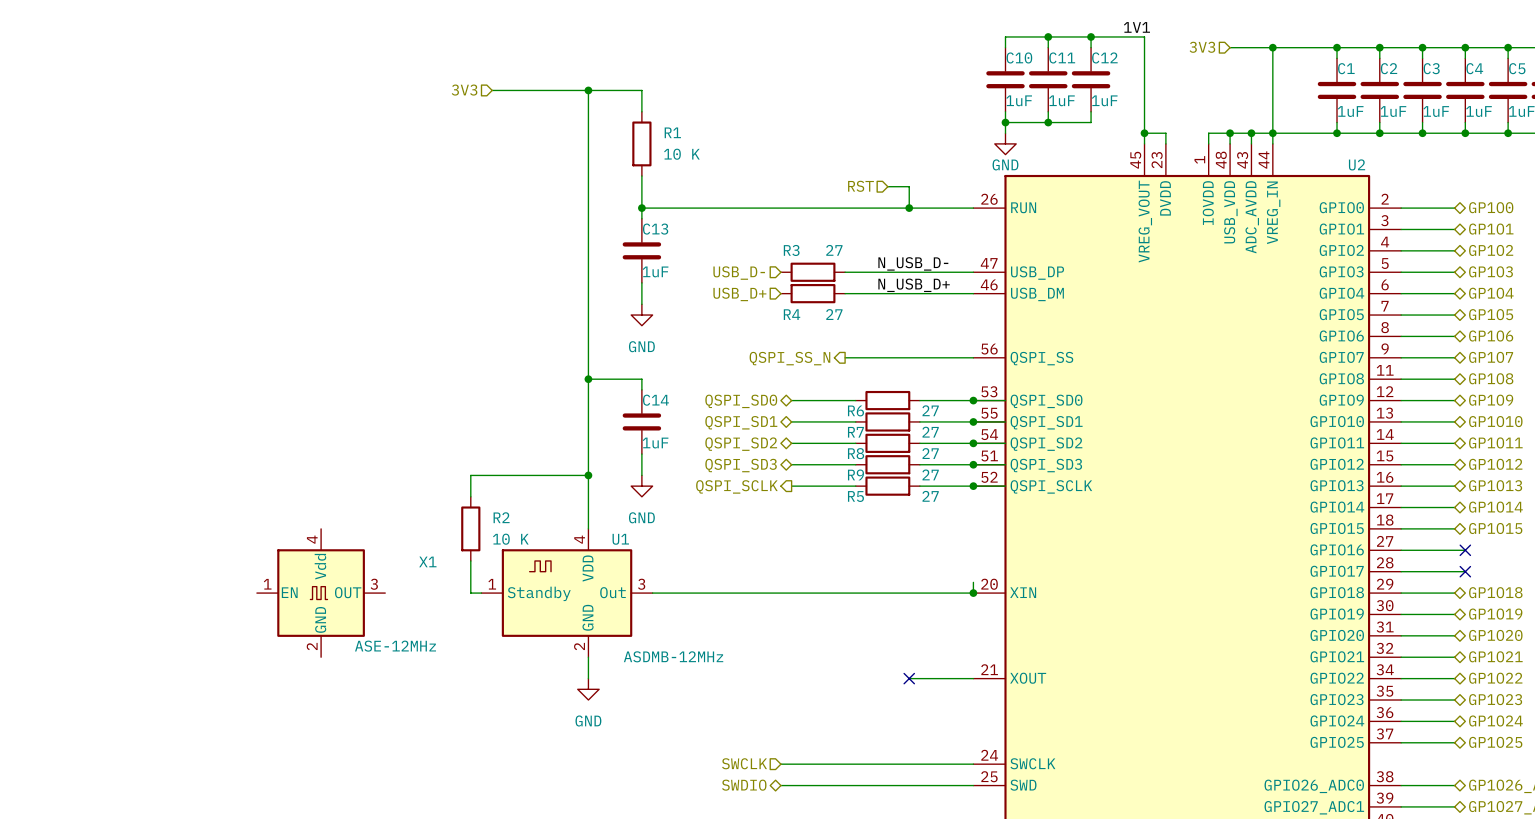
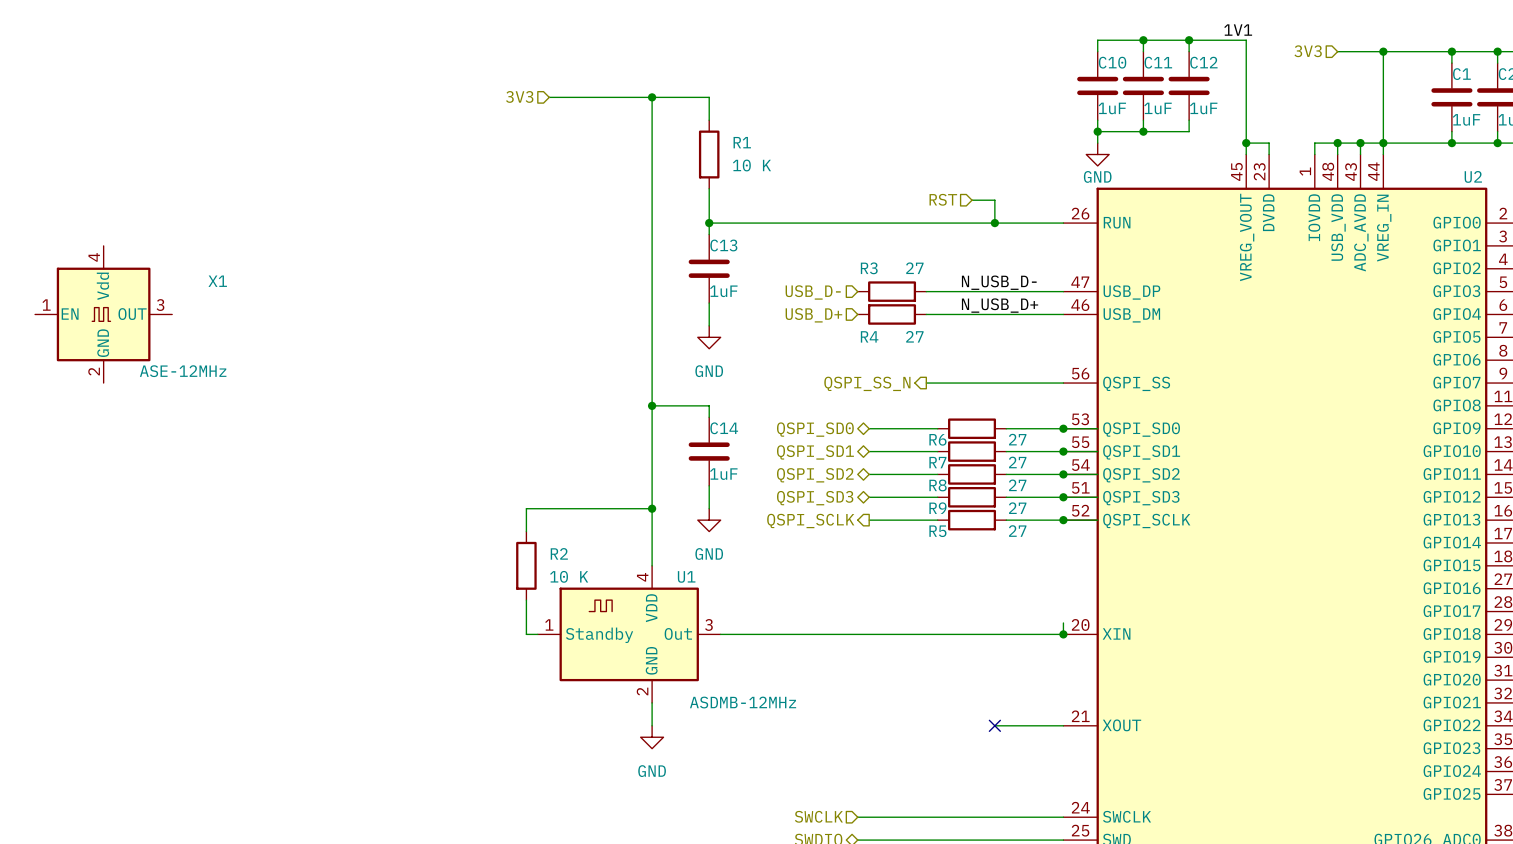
X1 position: (321, 593) -> (103, 314)

